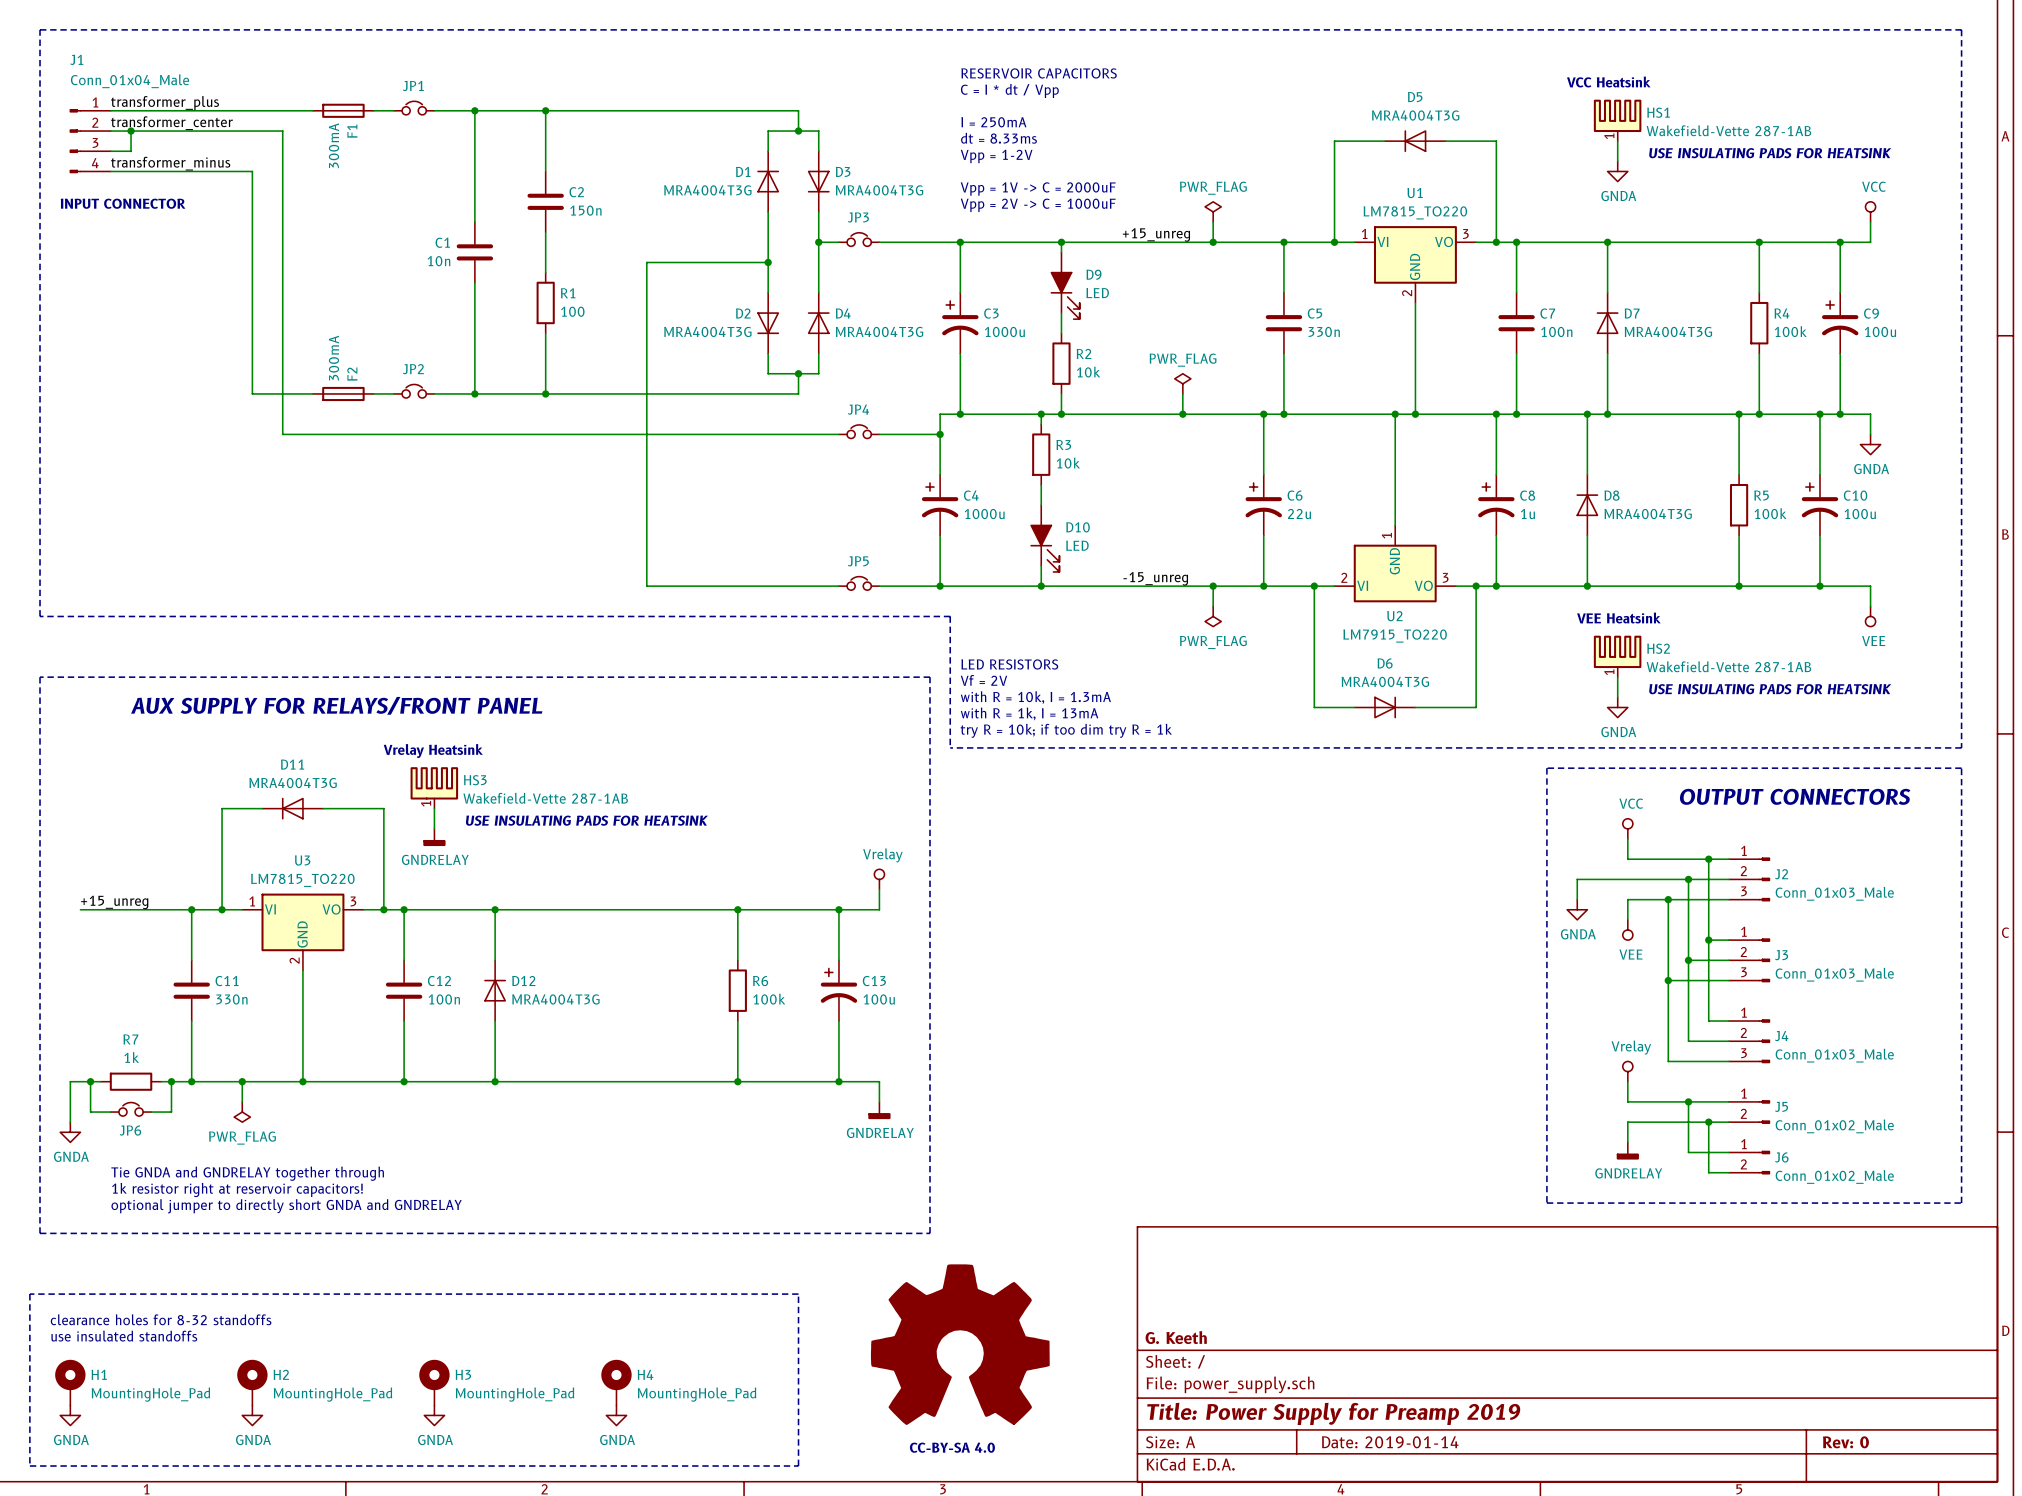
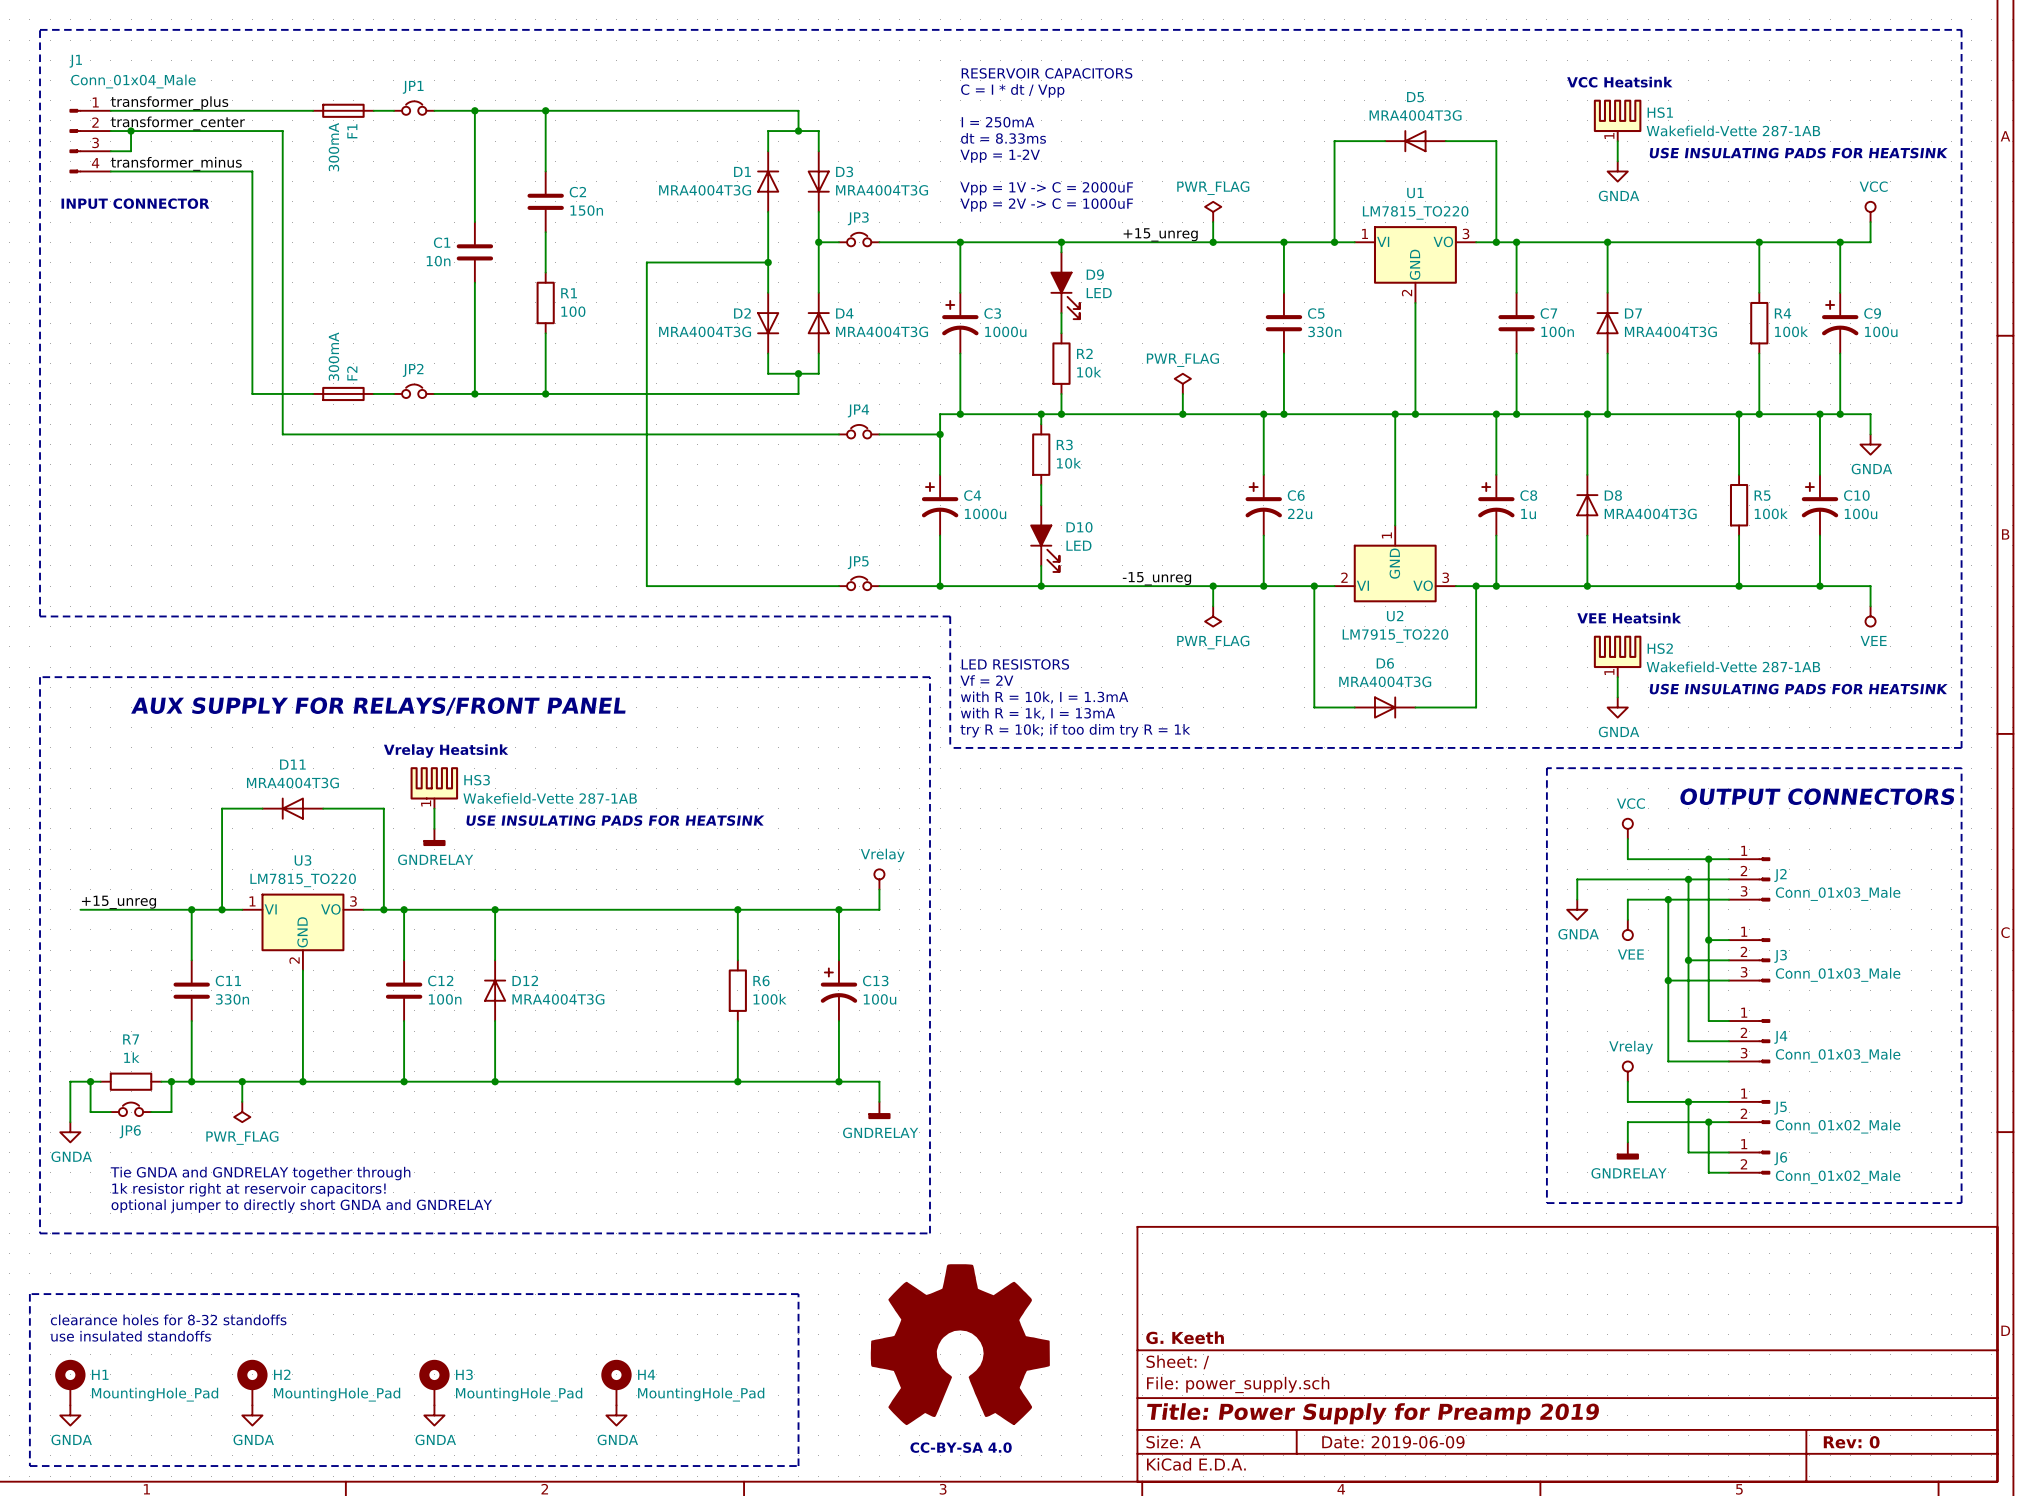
title block: Date: 2019-01-14 (1390, 1442) -> Date: 2019-06-09 (1393, 1442)

